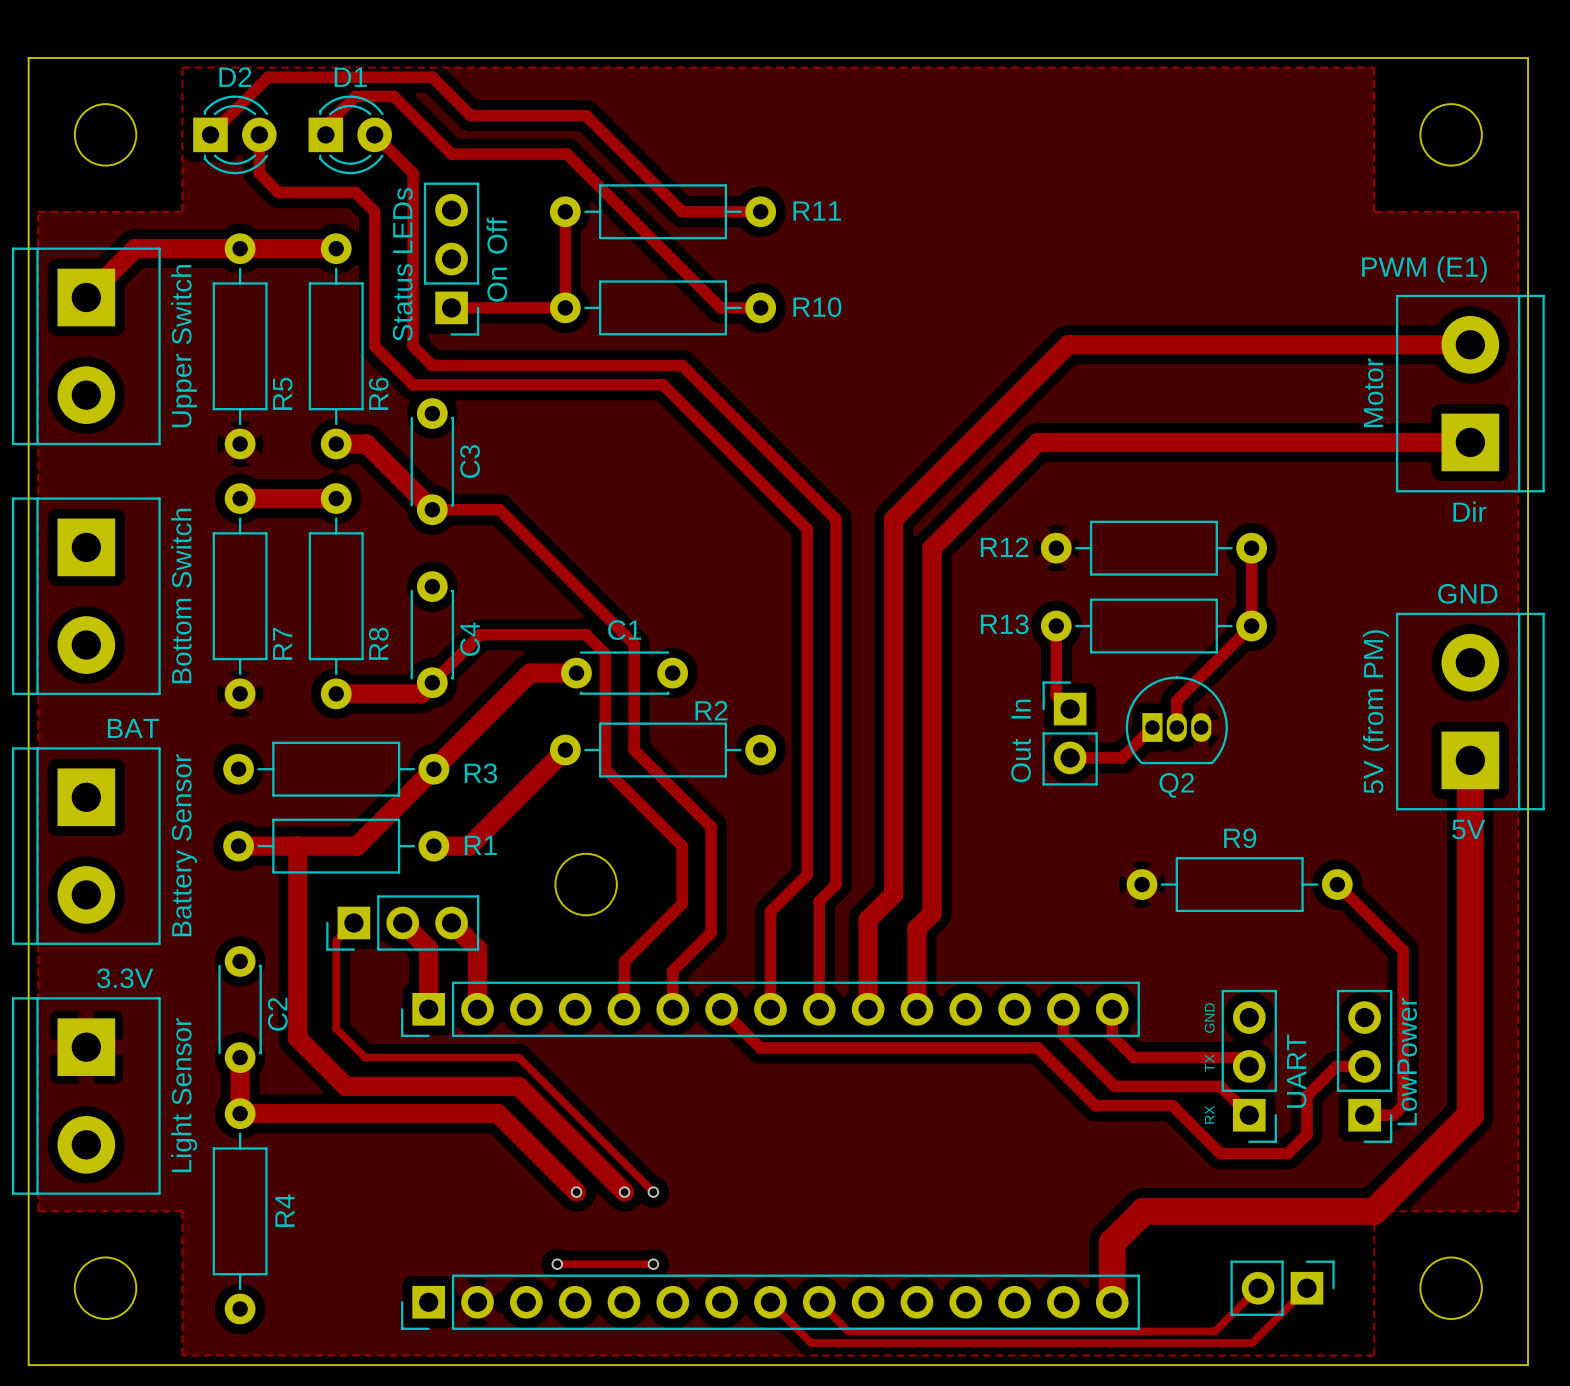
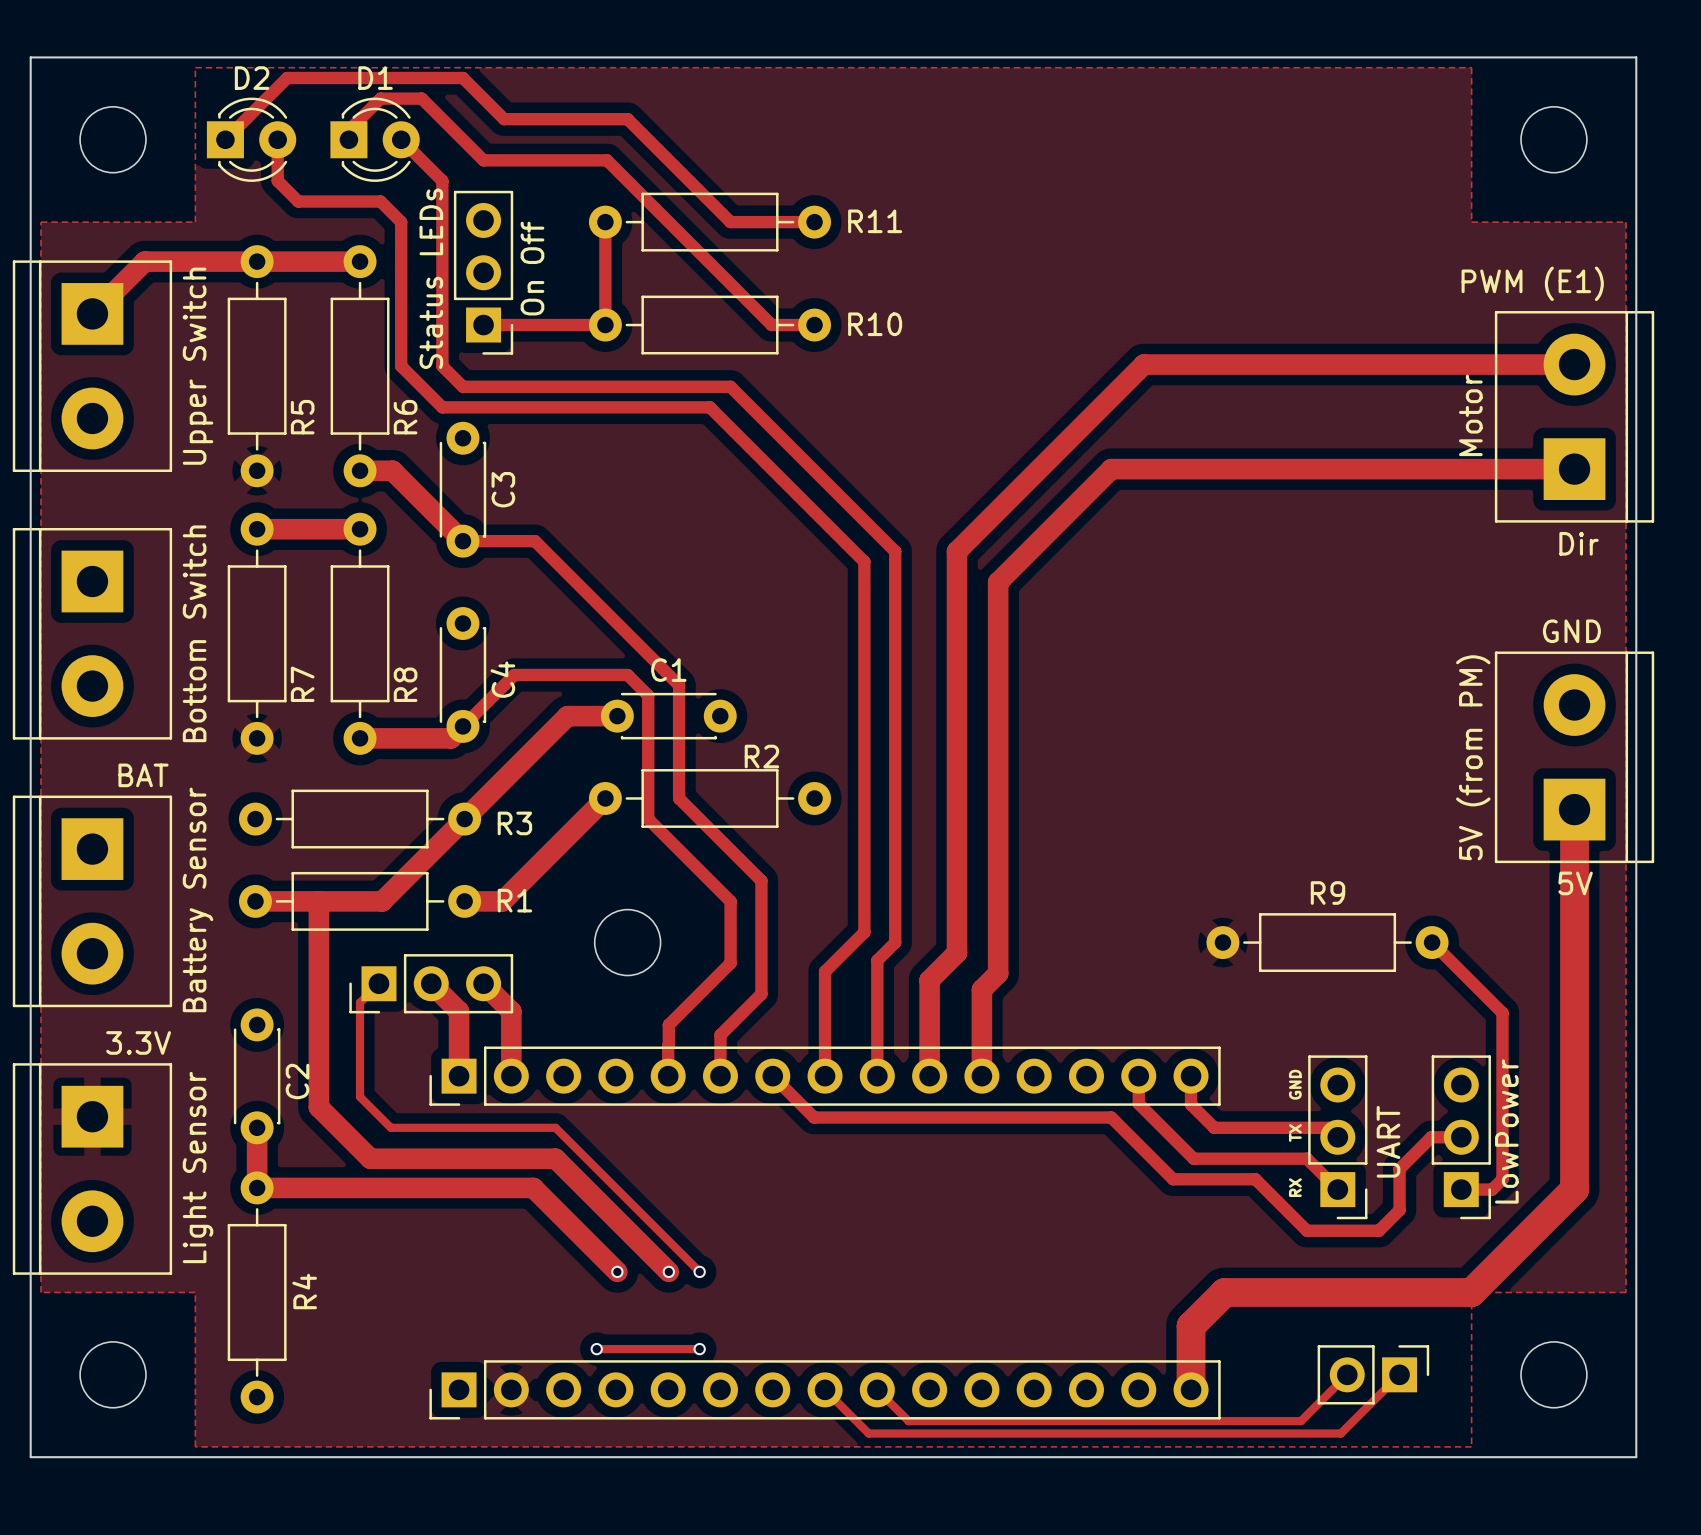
R12: (1153, 548) -> none
track: (1251, 548) (1251, 626) (1176, 700) (1176, 727) -> none
track: (1056, 626) (1056, 695) (1070, 709) -> none
R13: (1153, 626) -> none
text: In (1021, 709) -> none
Q2: (1176, 720) -> none
track: (1152, 727) (1122, 757) (1070, 757) -> none
part: (1070, 733) -> none
text: Out (1021, 760) -> none

